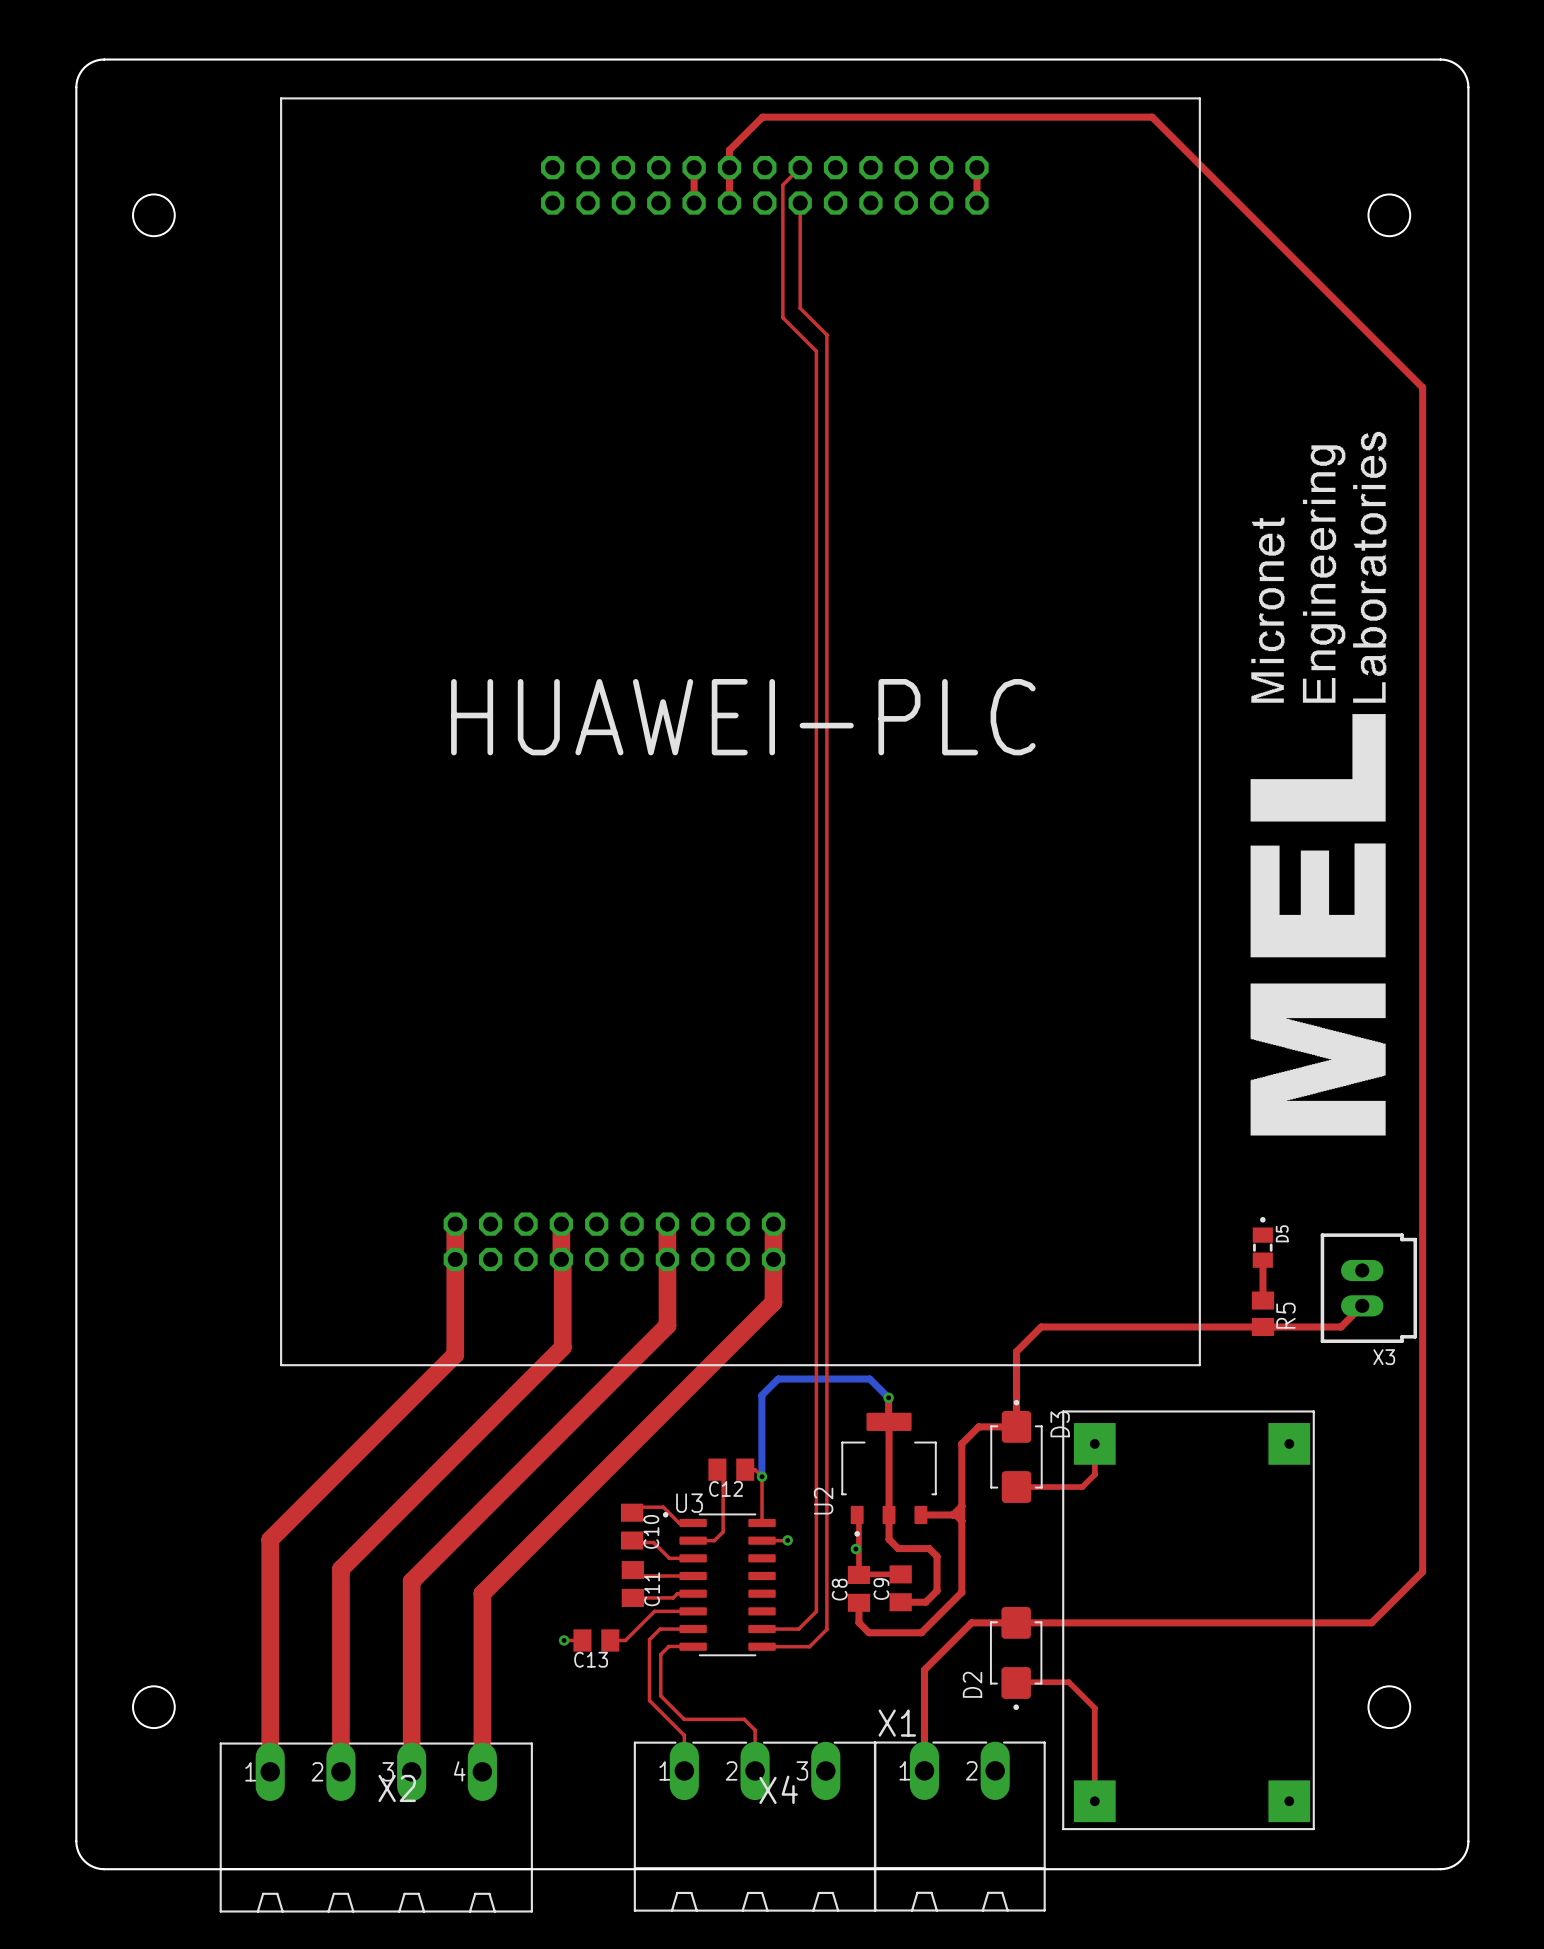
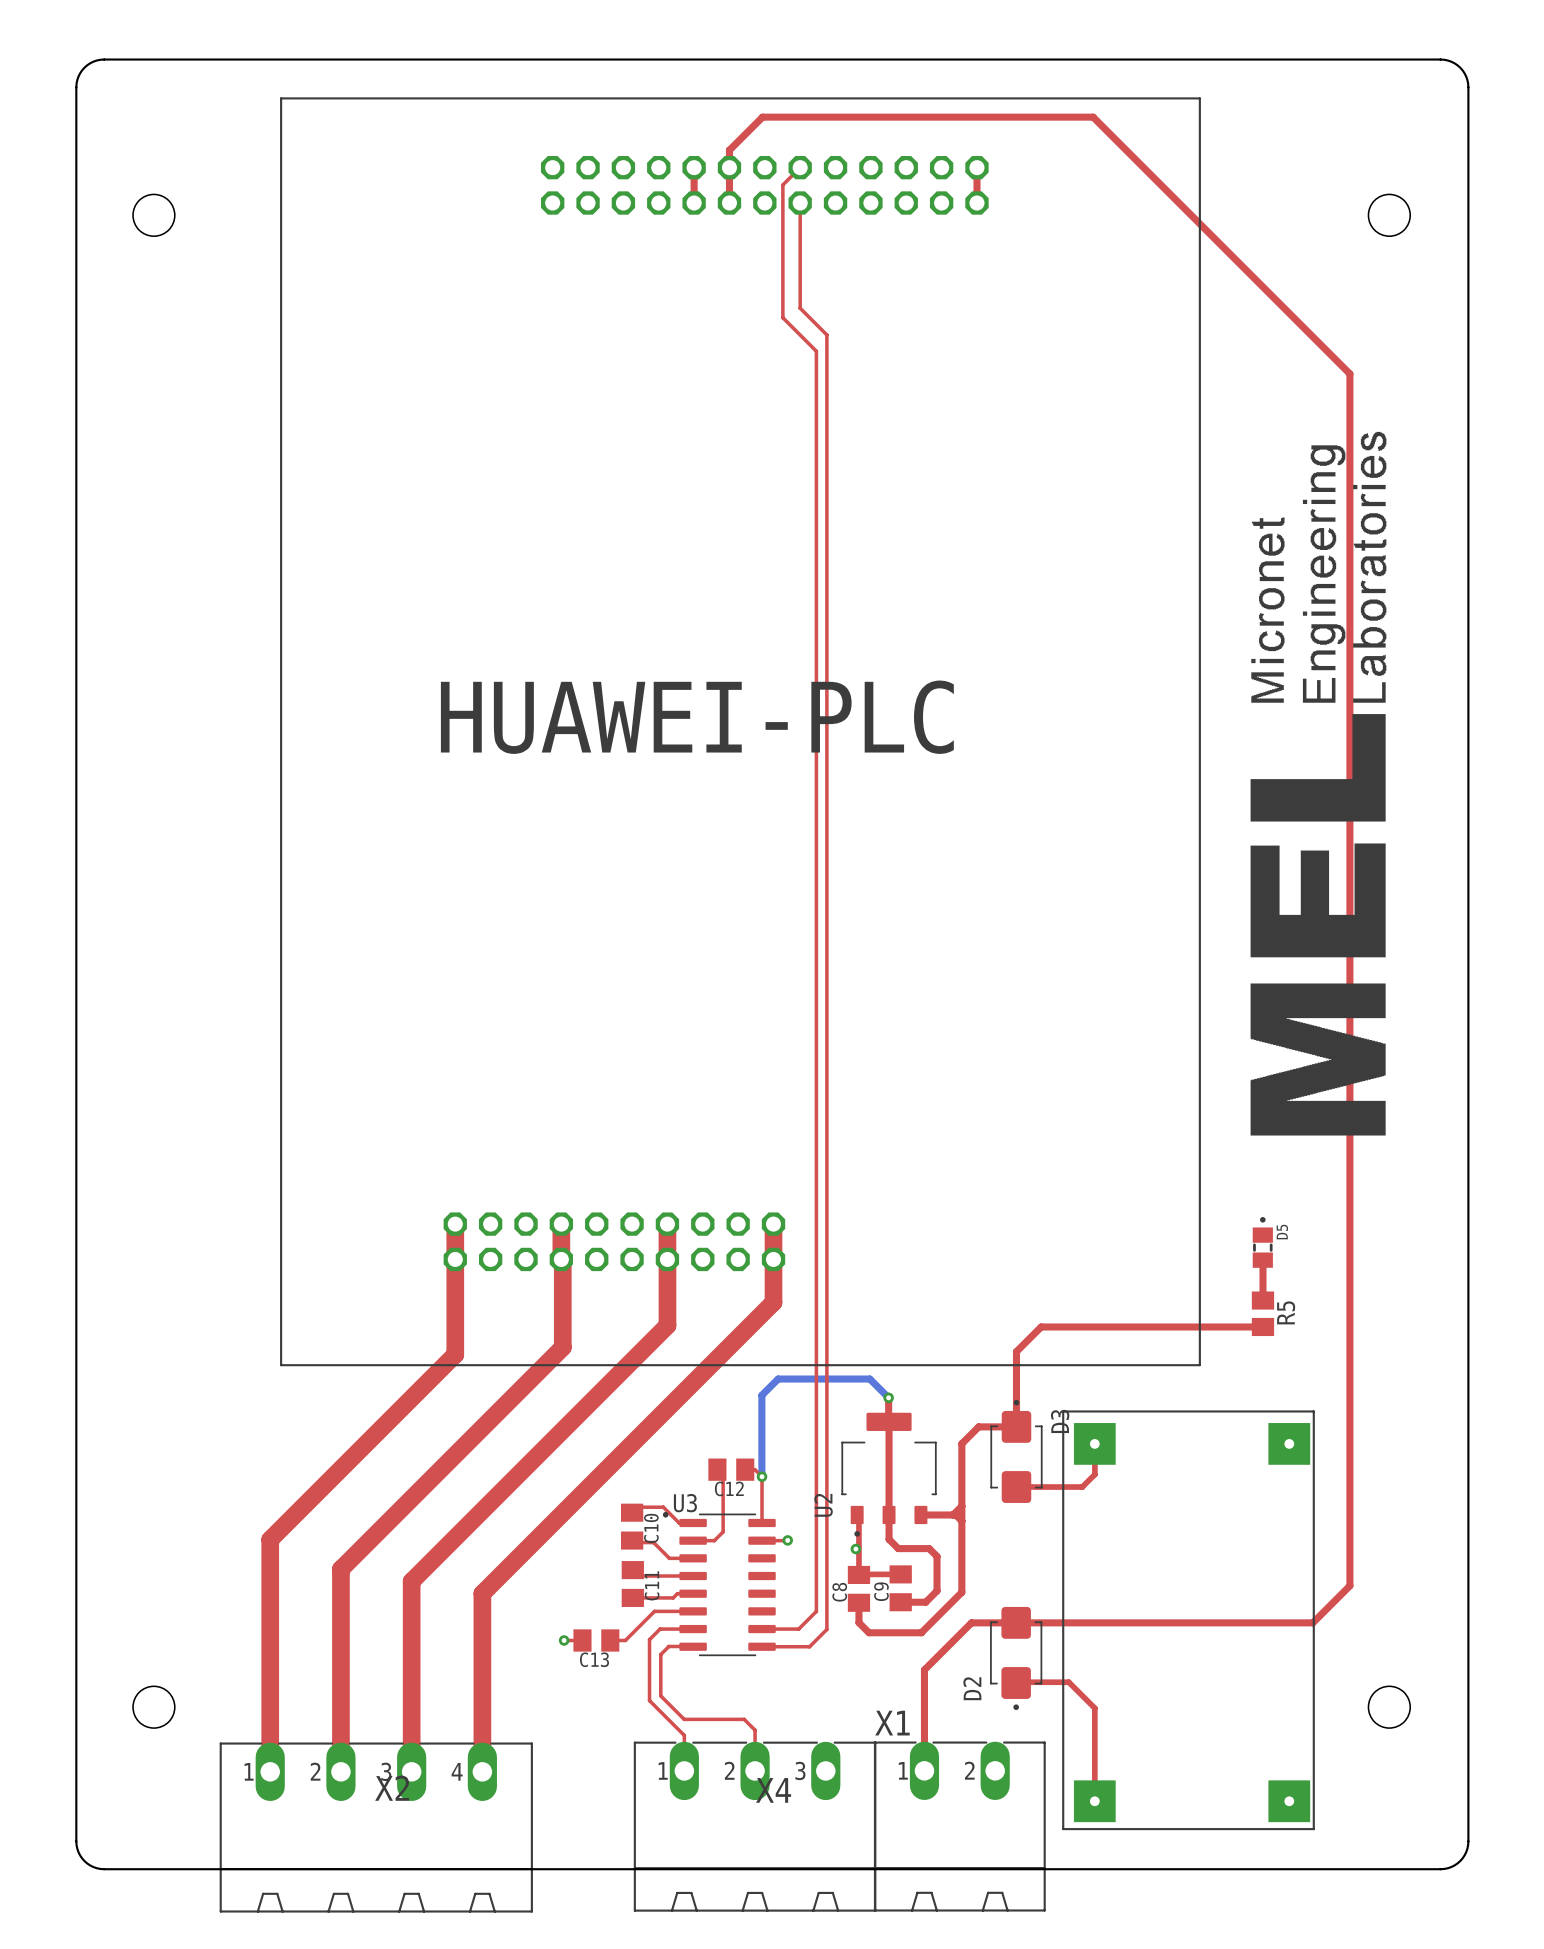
top track: (1093, 117) (1152, 117) (1422, 387) (1422, 1571) (1371, 1622) (1312, 1622) -> (1093, 117) (1349, 373) (1349, 1585) (1312, 1622)
X3: (1368, 1288) -> none
top track: (1362, 1305) (1341, 1326) (1262, 1326) -> none

